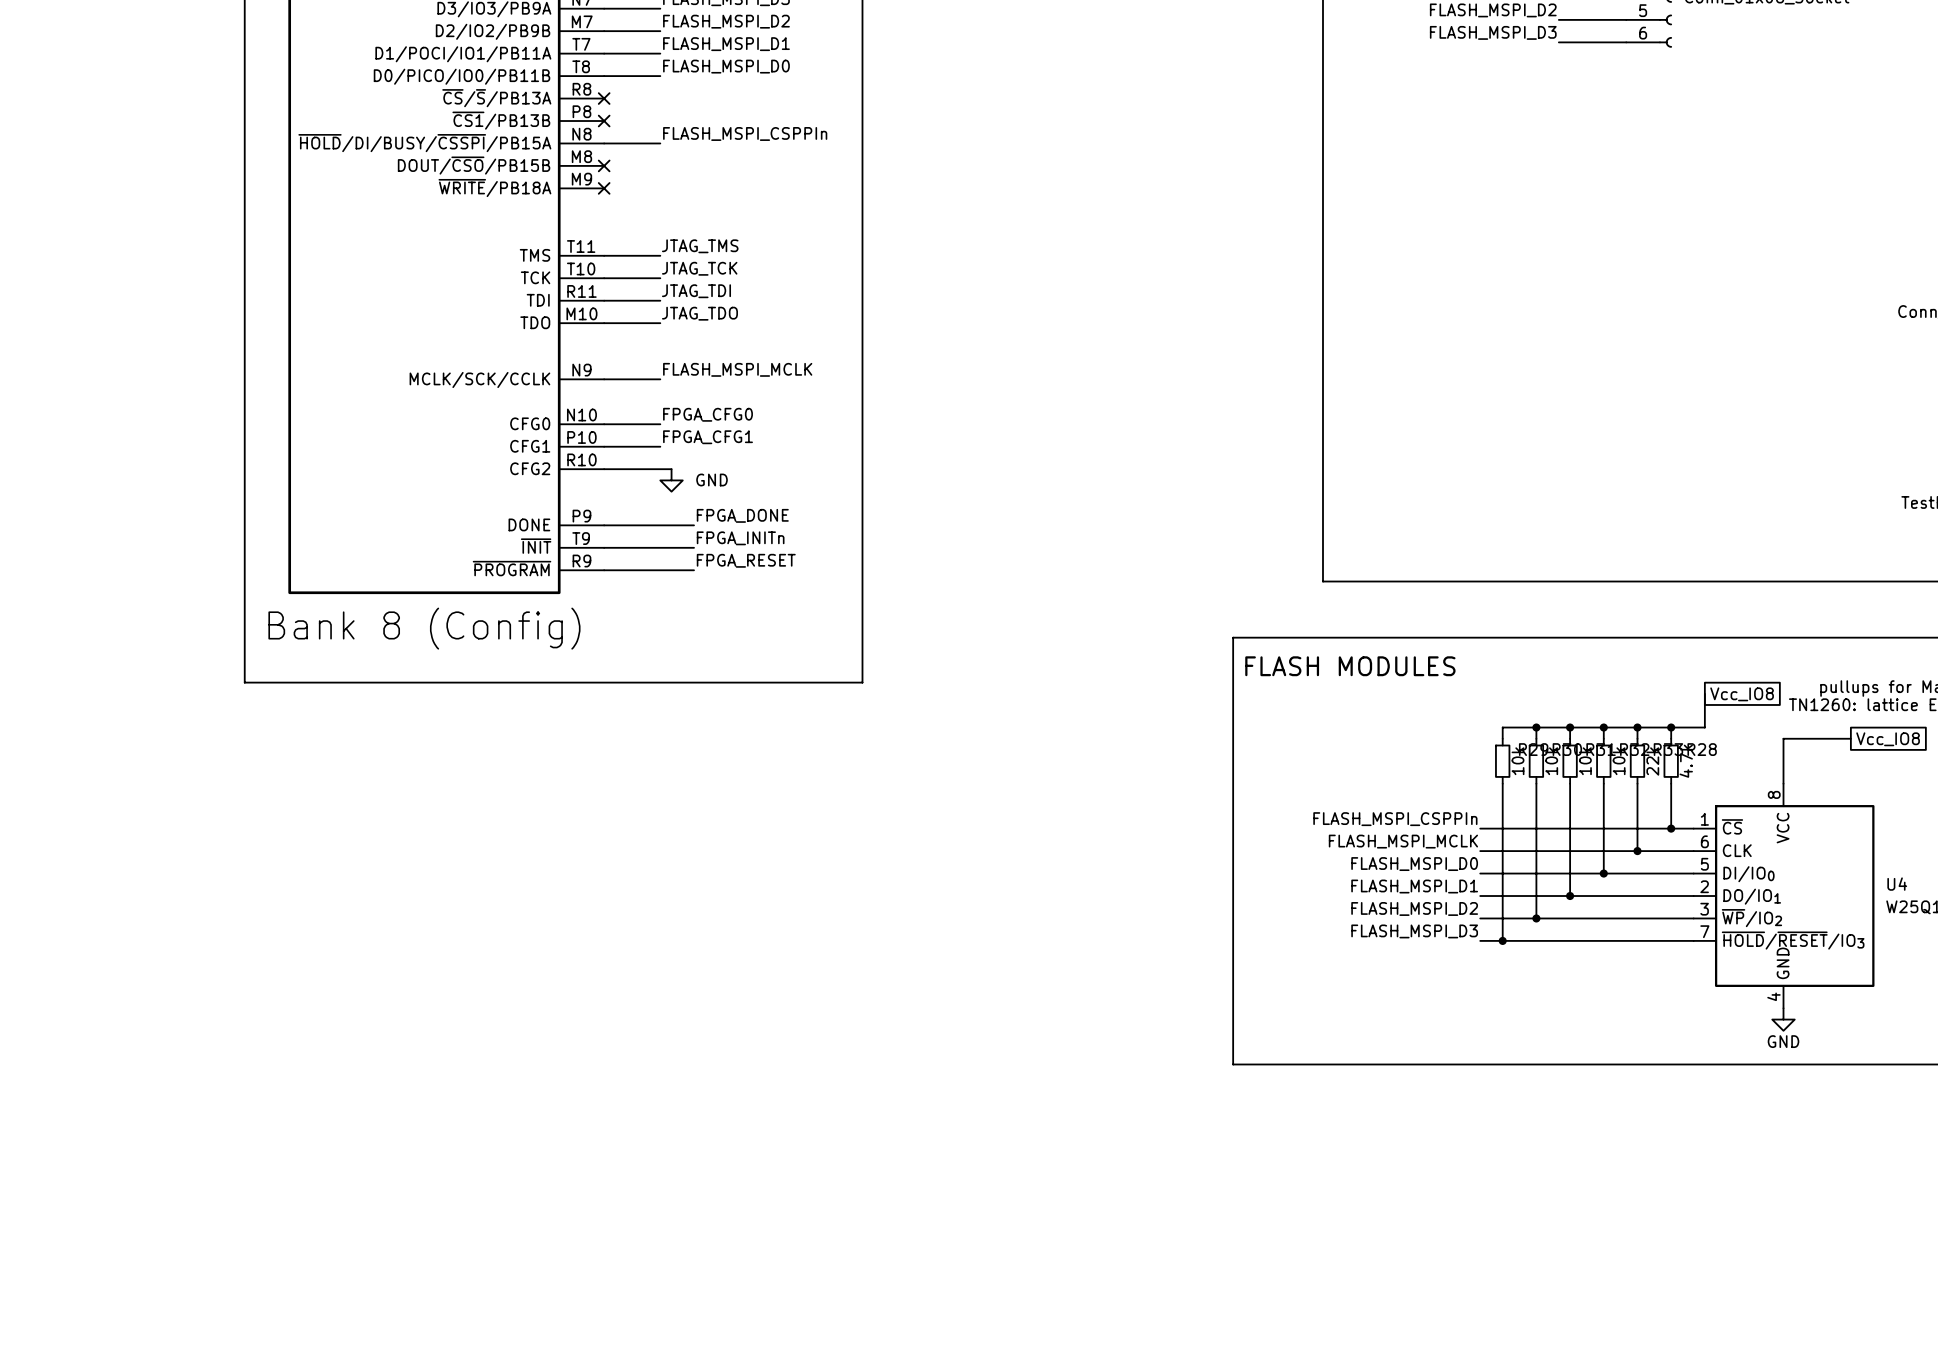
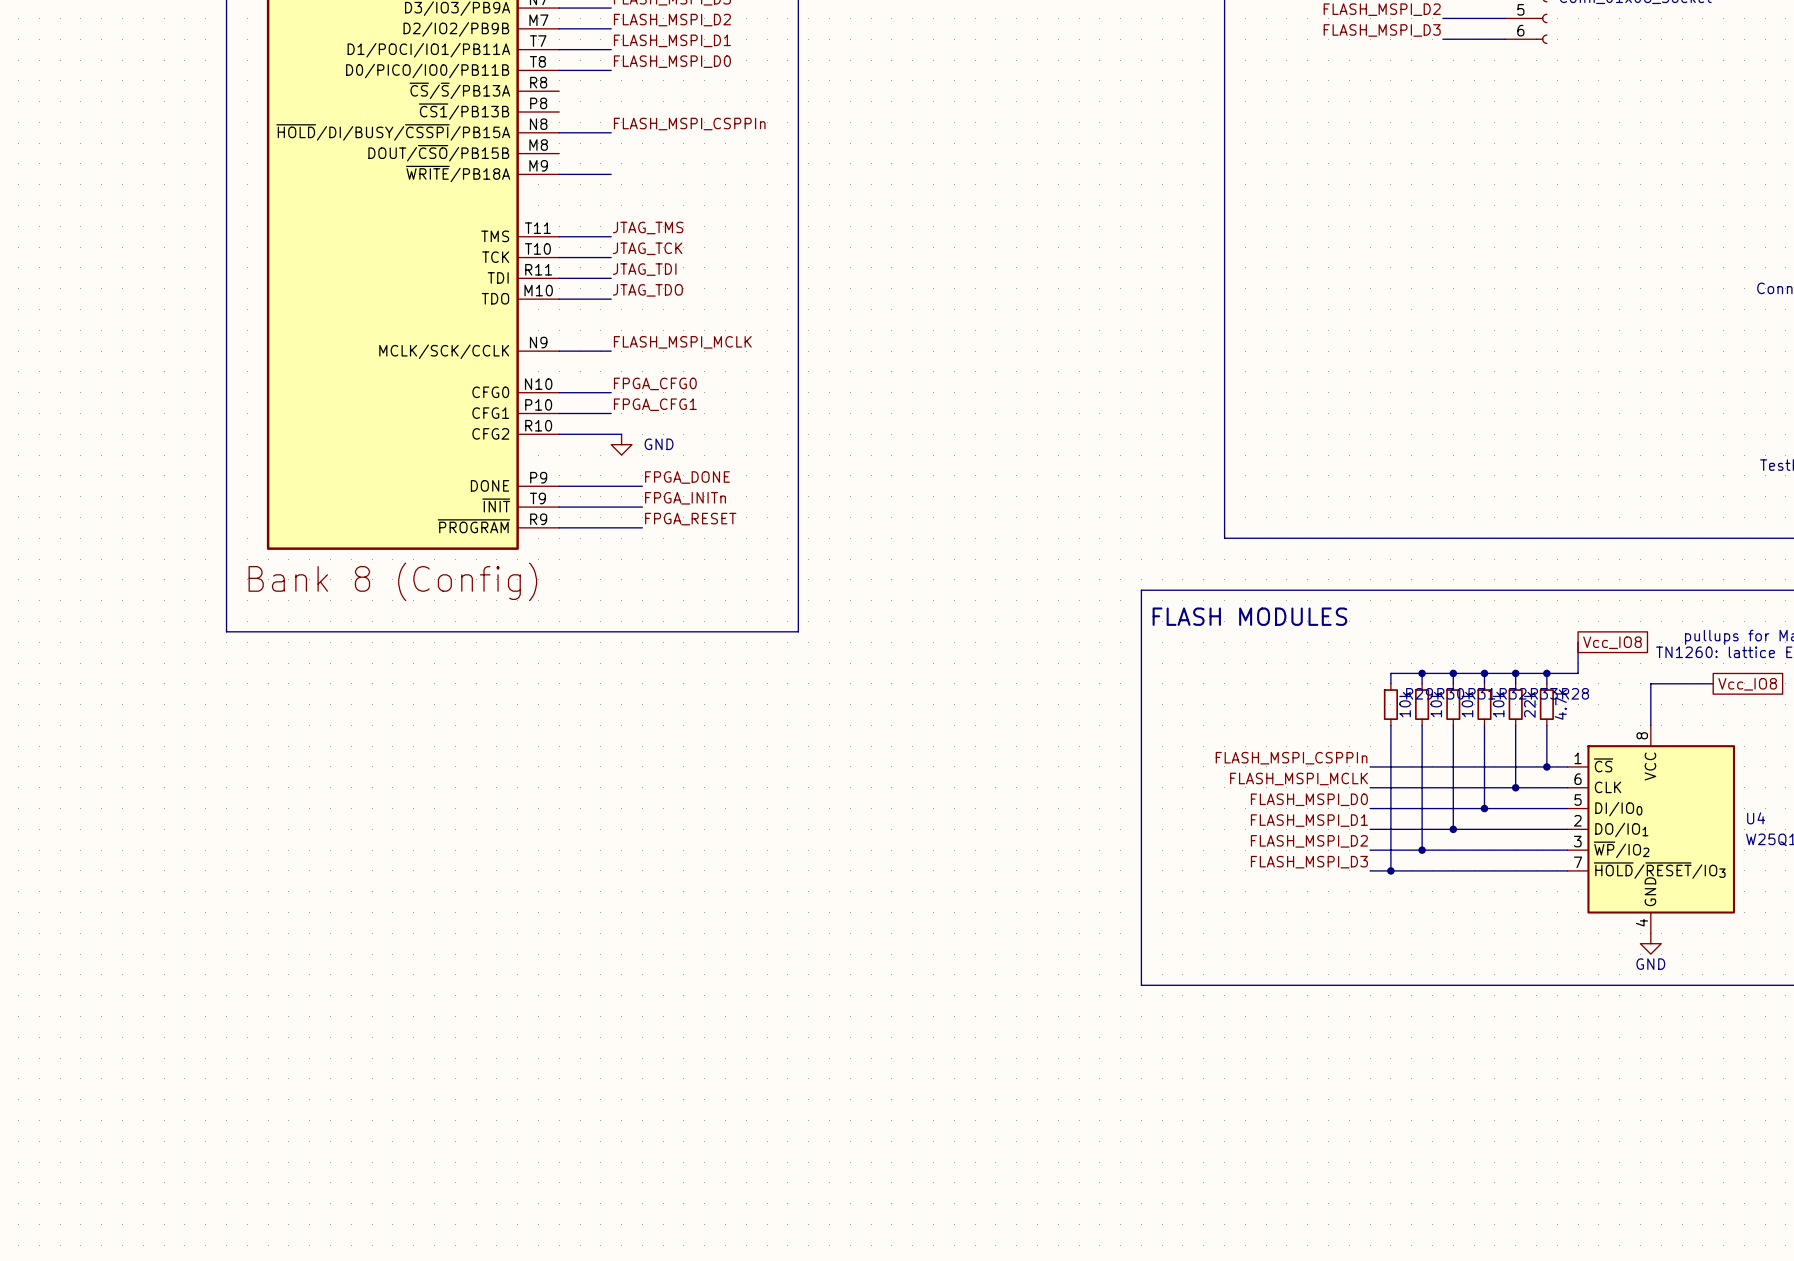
no-connect mark: (604, 98) -> none
no-connect mark: (604, 121) -> none
no-connect mark: (604, 165) -> none
wire: none -> (559, 174) (611, 174)
no-connect mark: (604, 188) -> none

